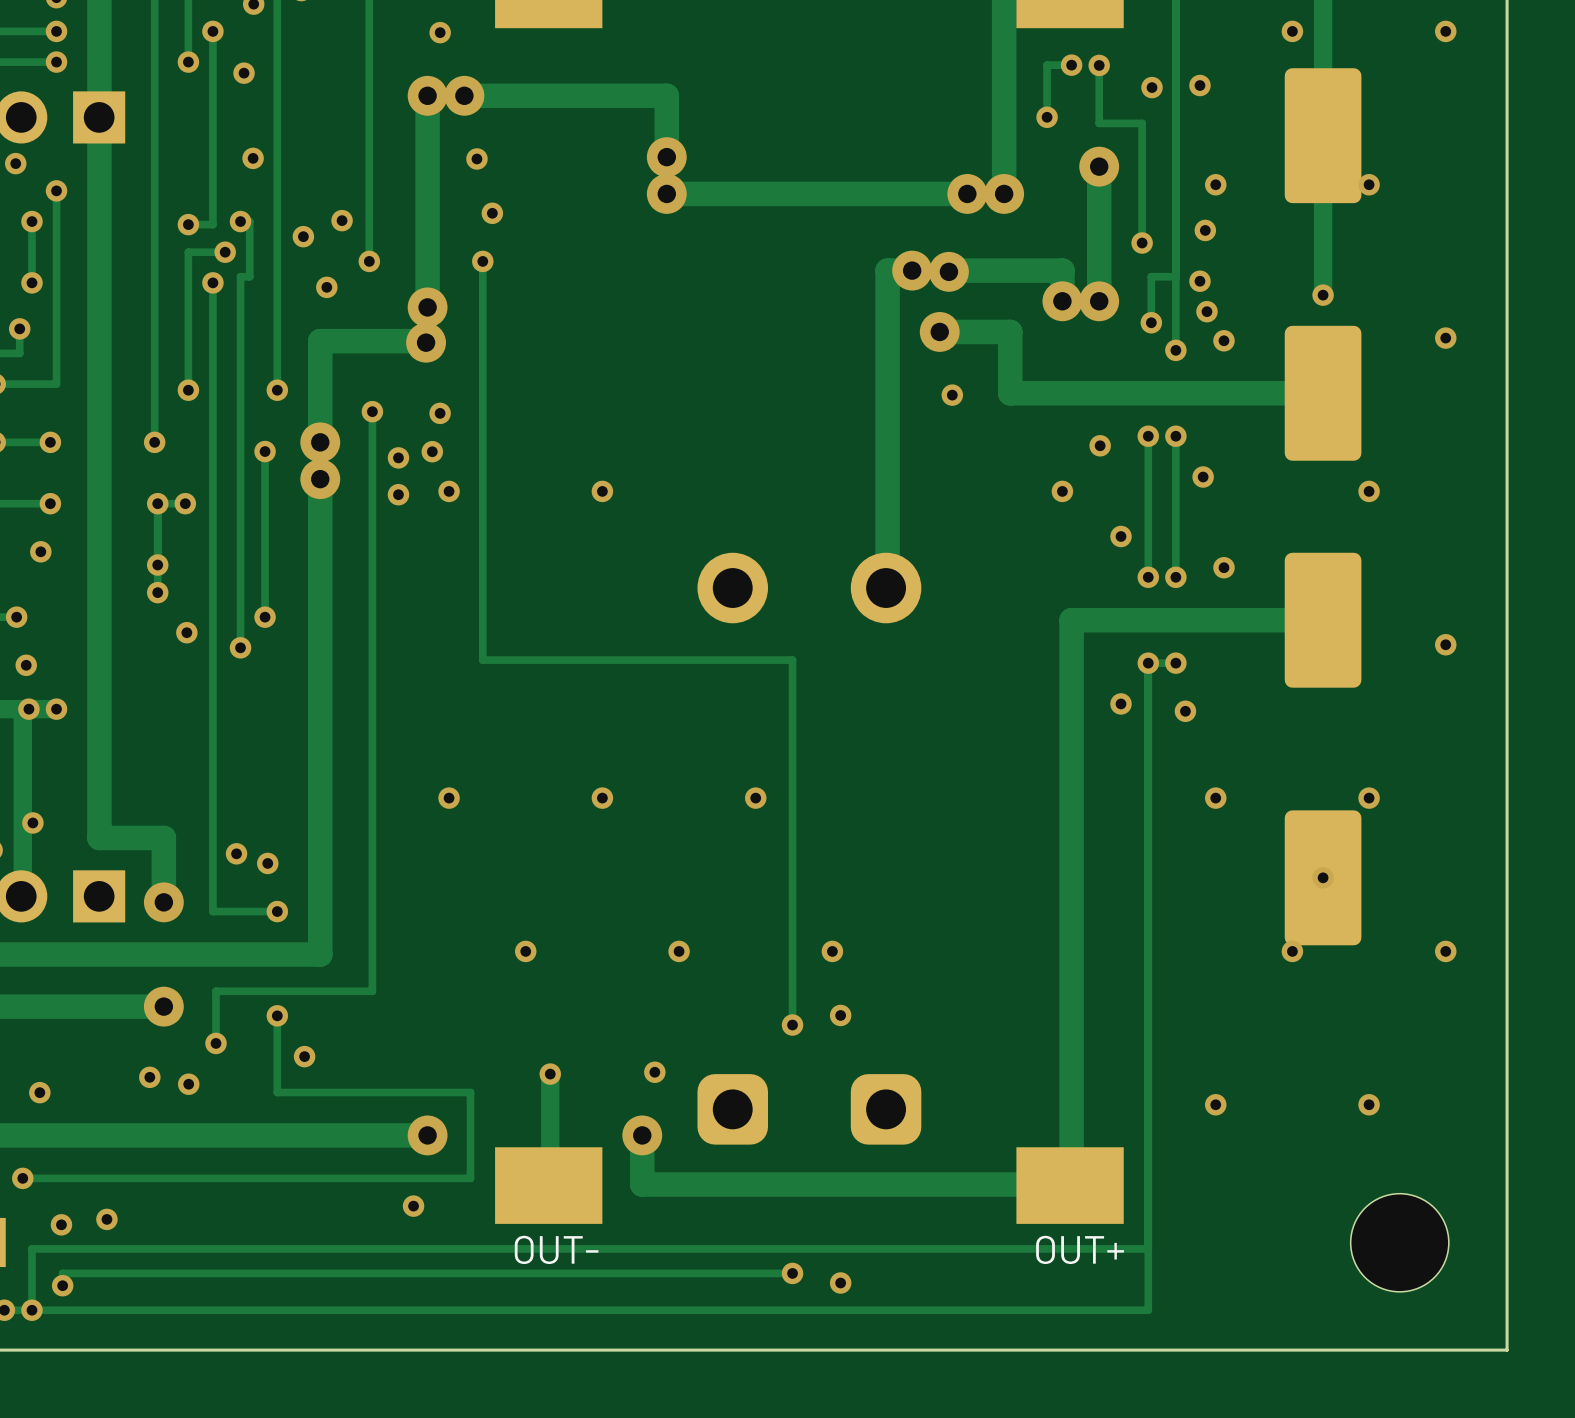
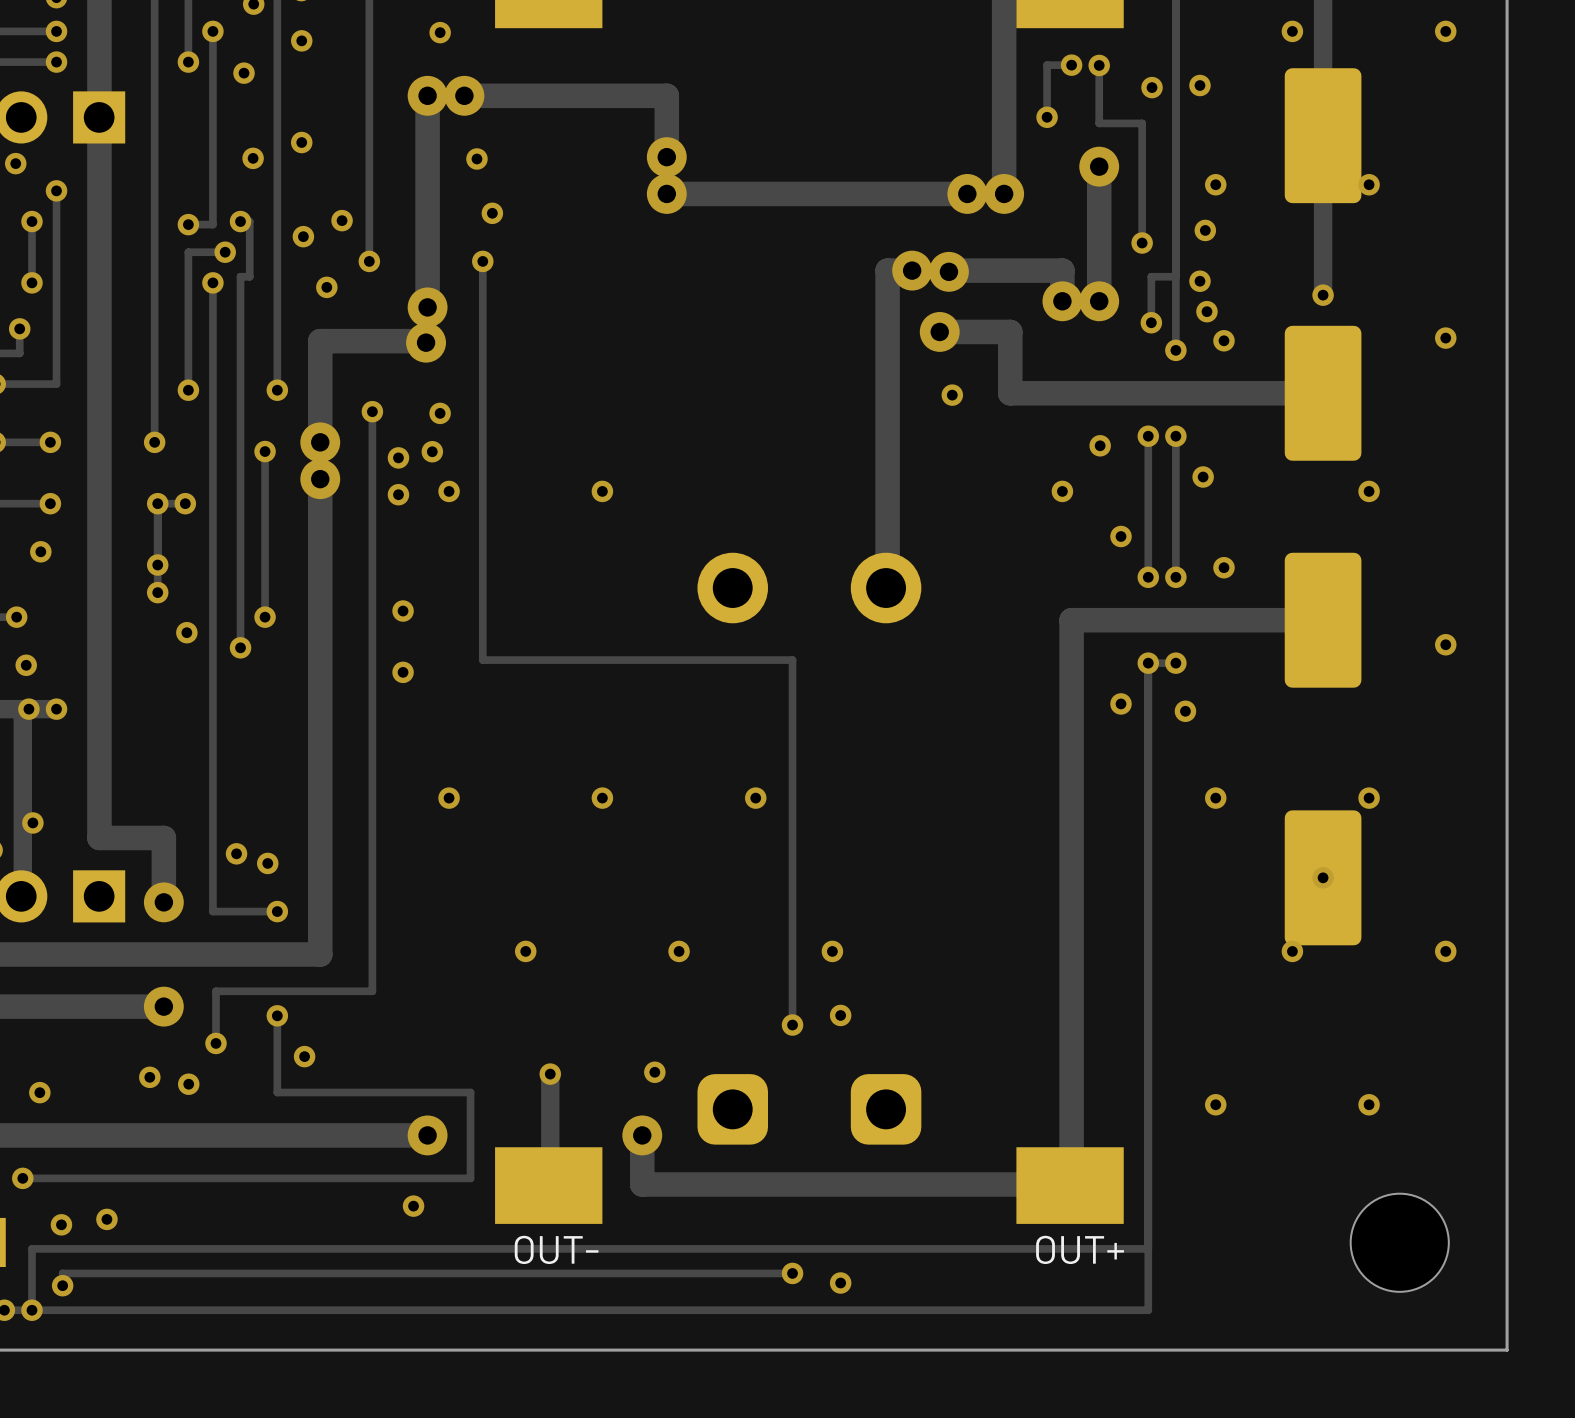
via: none -> (301, 40)
via: none -> (301, 142)
via: none -> (403, 611)
via: none -> (403, 672)

